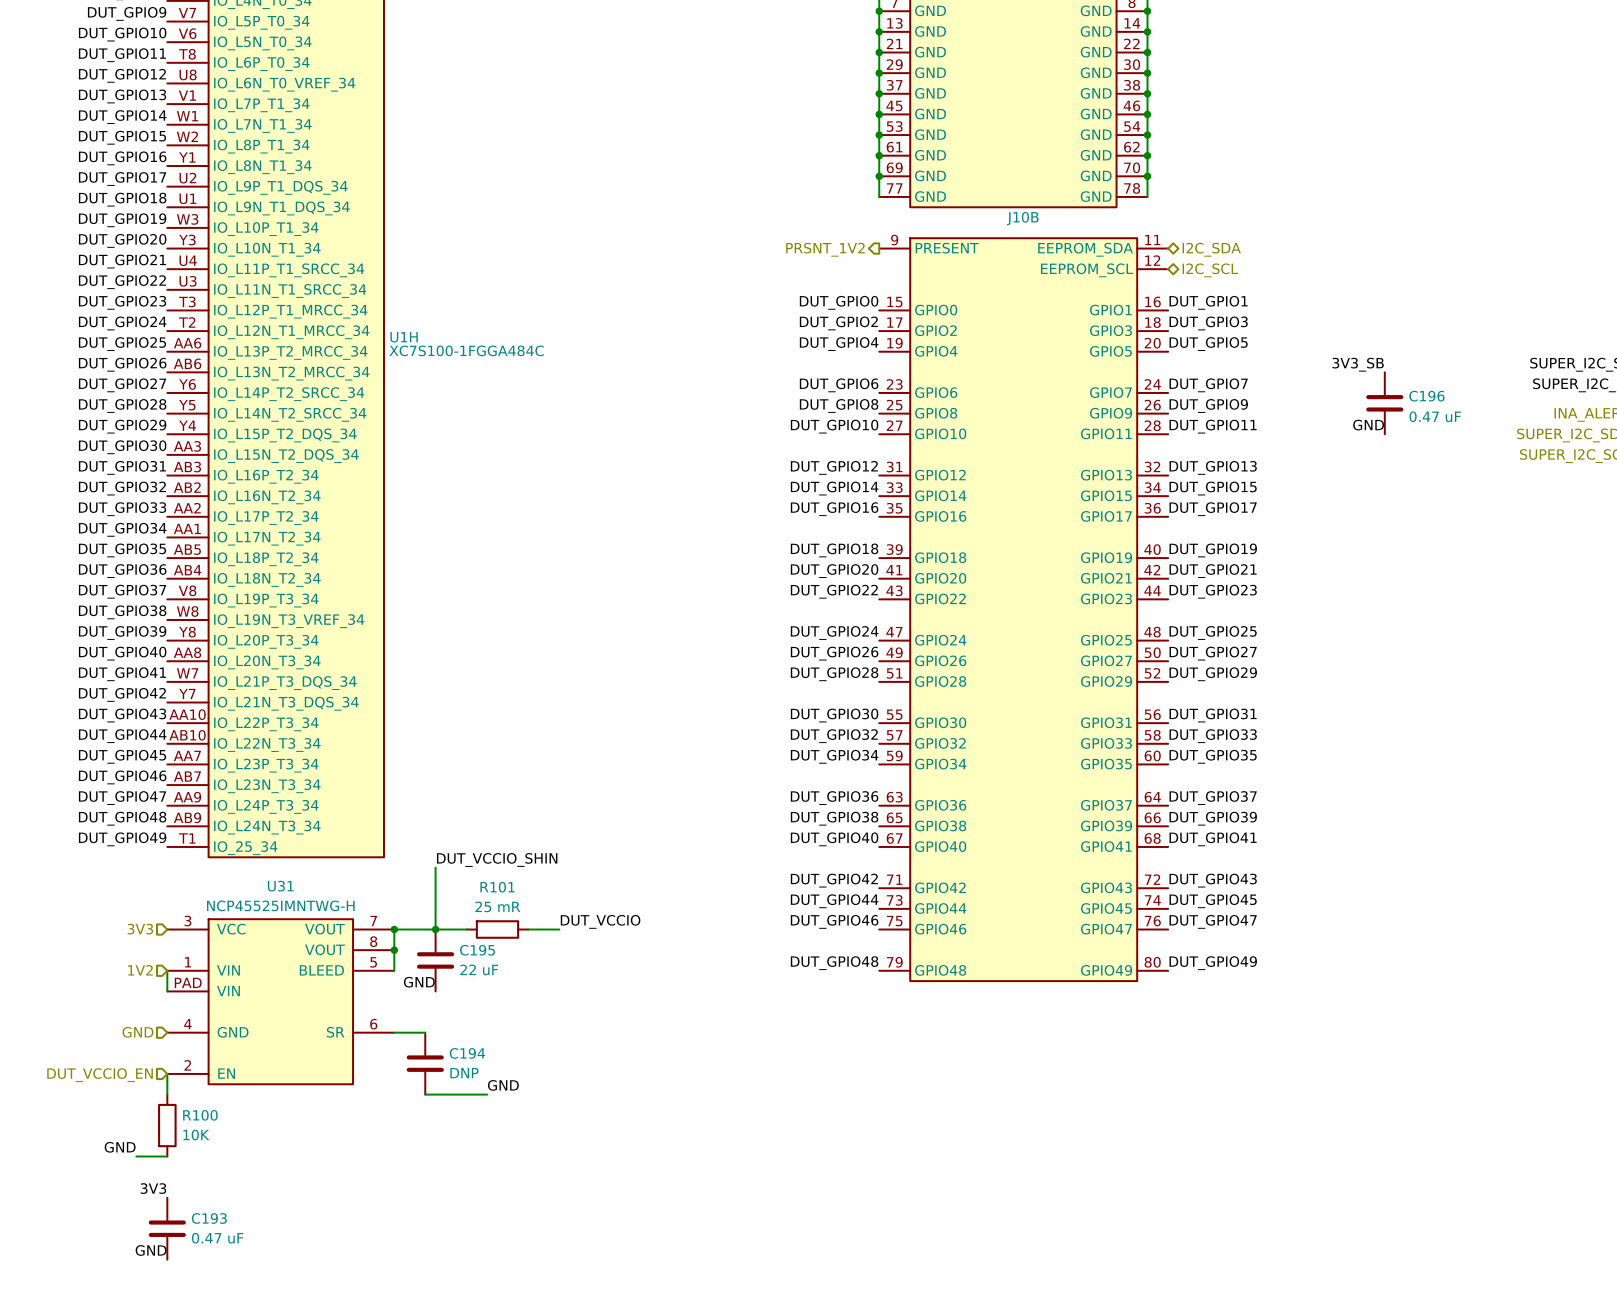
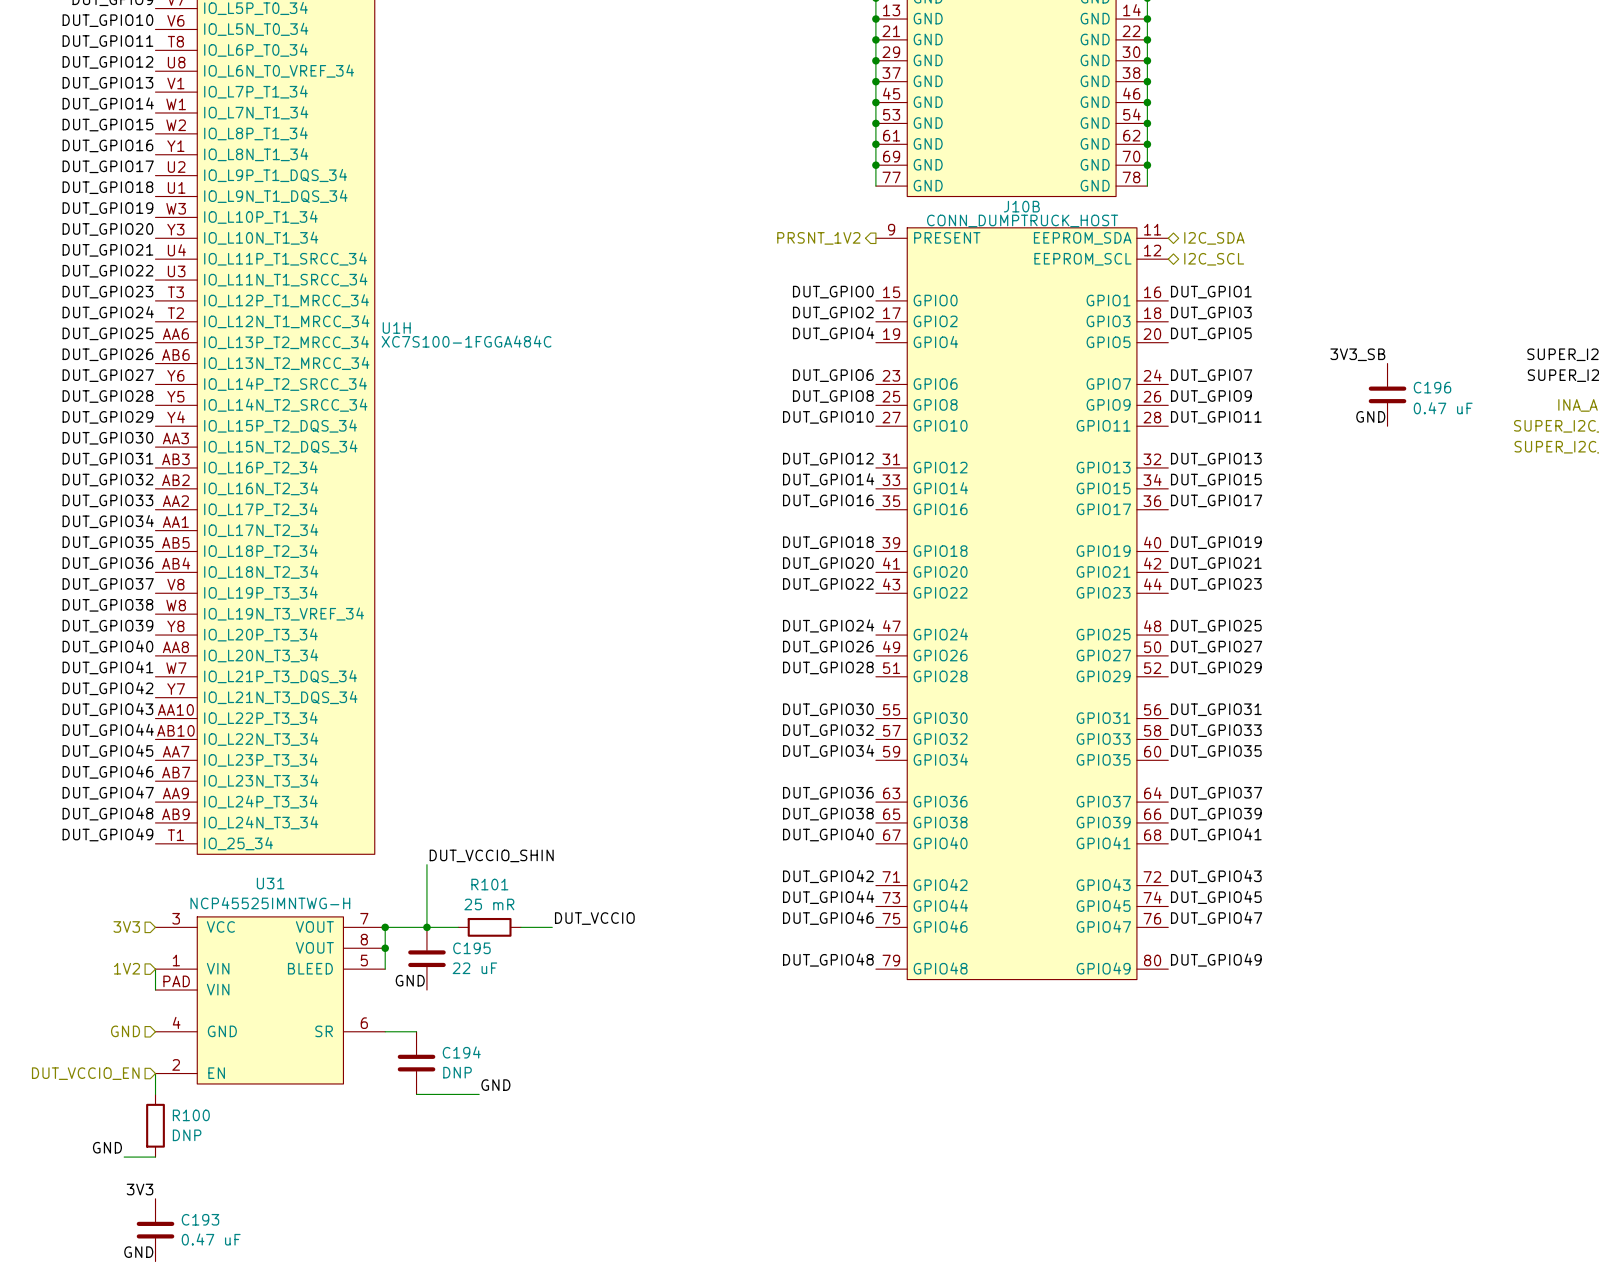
J10B value: none -> CONN_DUMPTRUCK_HOST (1022, 220)
R100 value: 10K (196, 1135) -> DNP (187, 1135)

